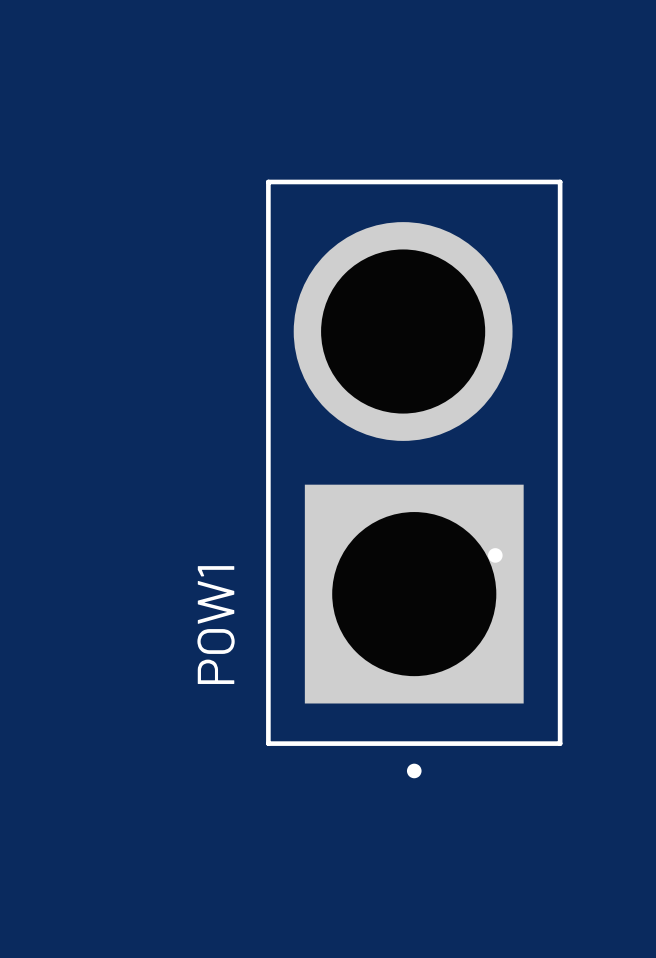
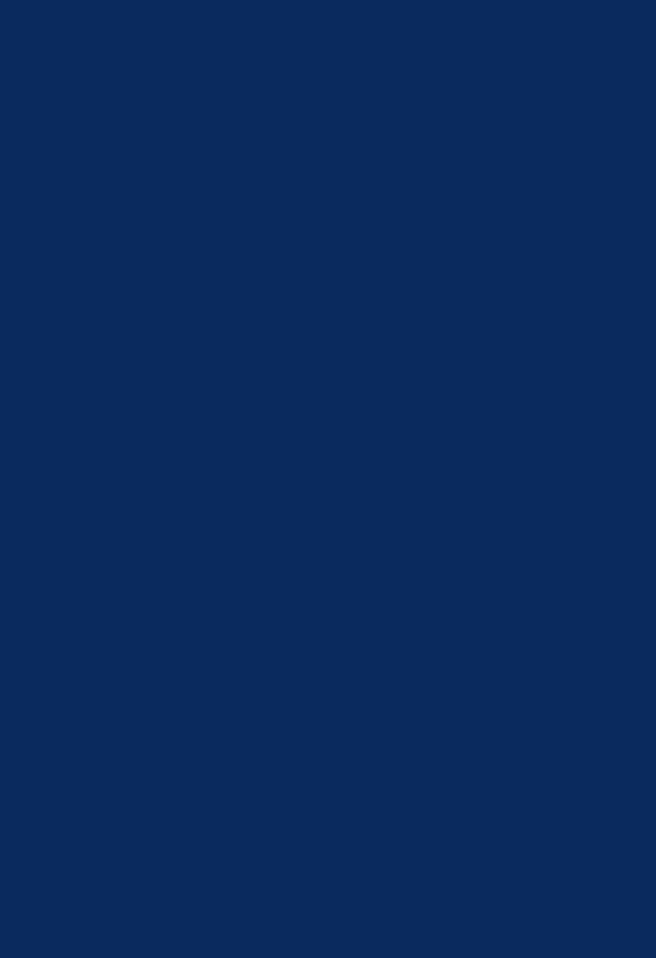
POW1: (414, 478) -> none

